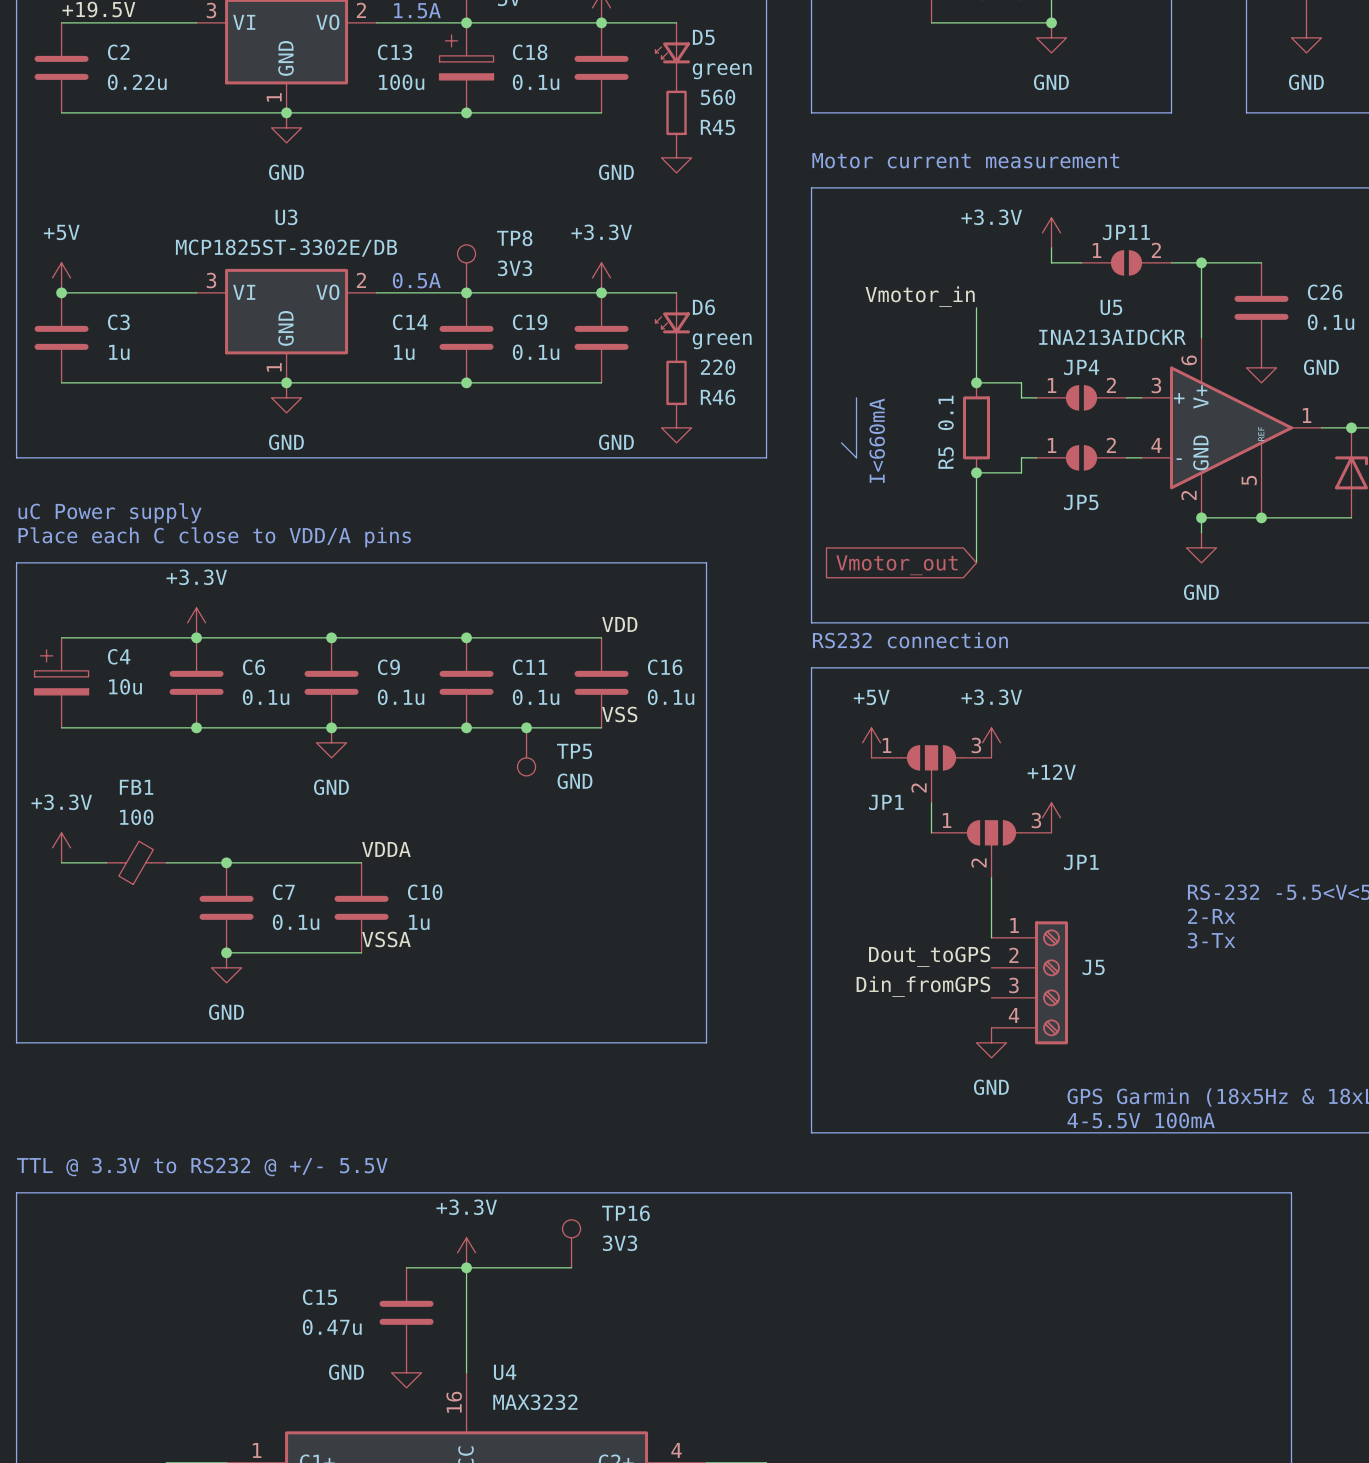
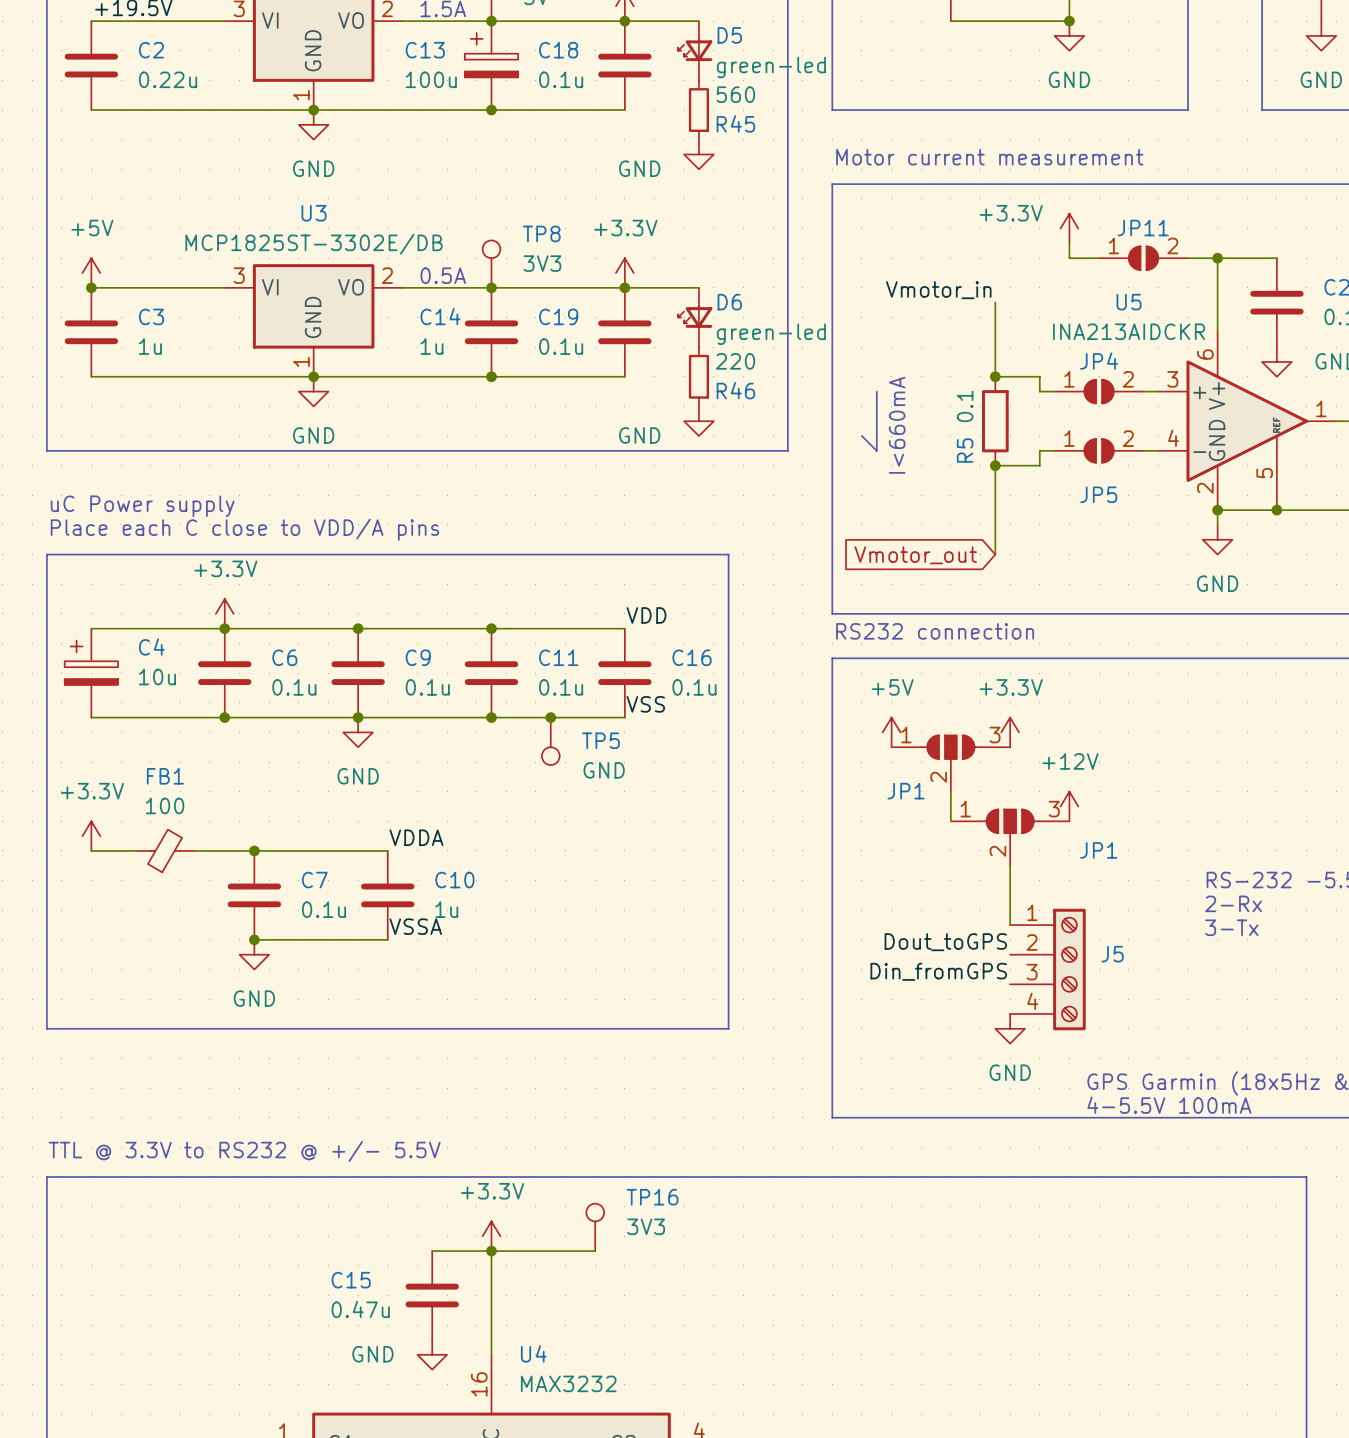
D5 value: green (722, 71) -> green-led (771, 67)
D6 value: green (722, 341) -> green-led (771, 334)

